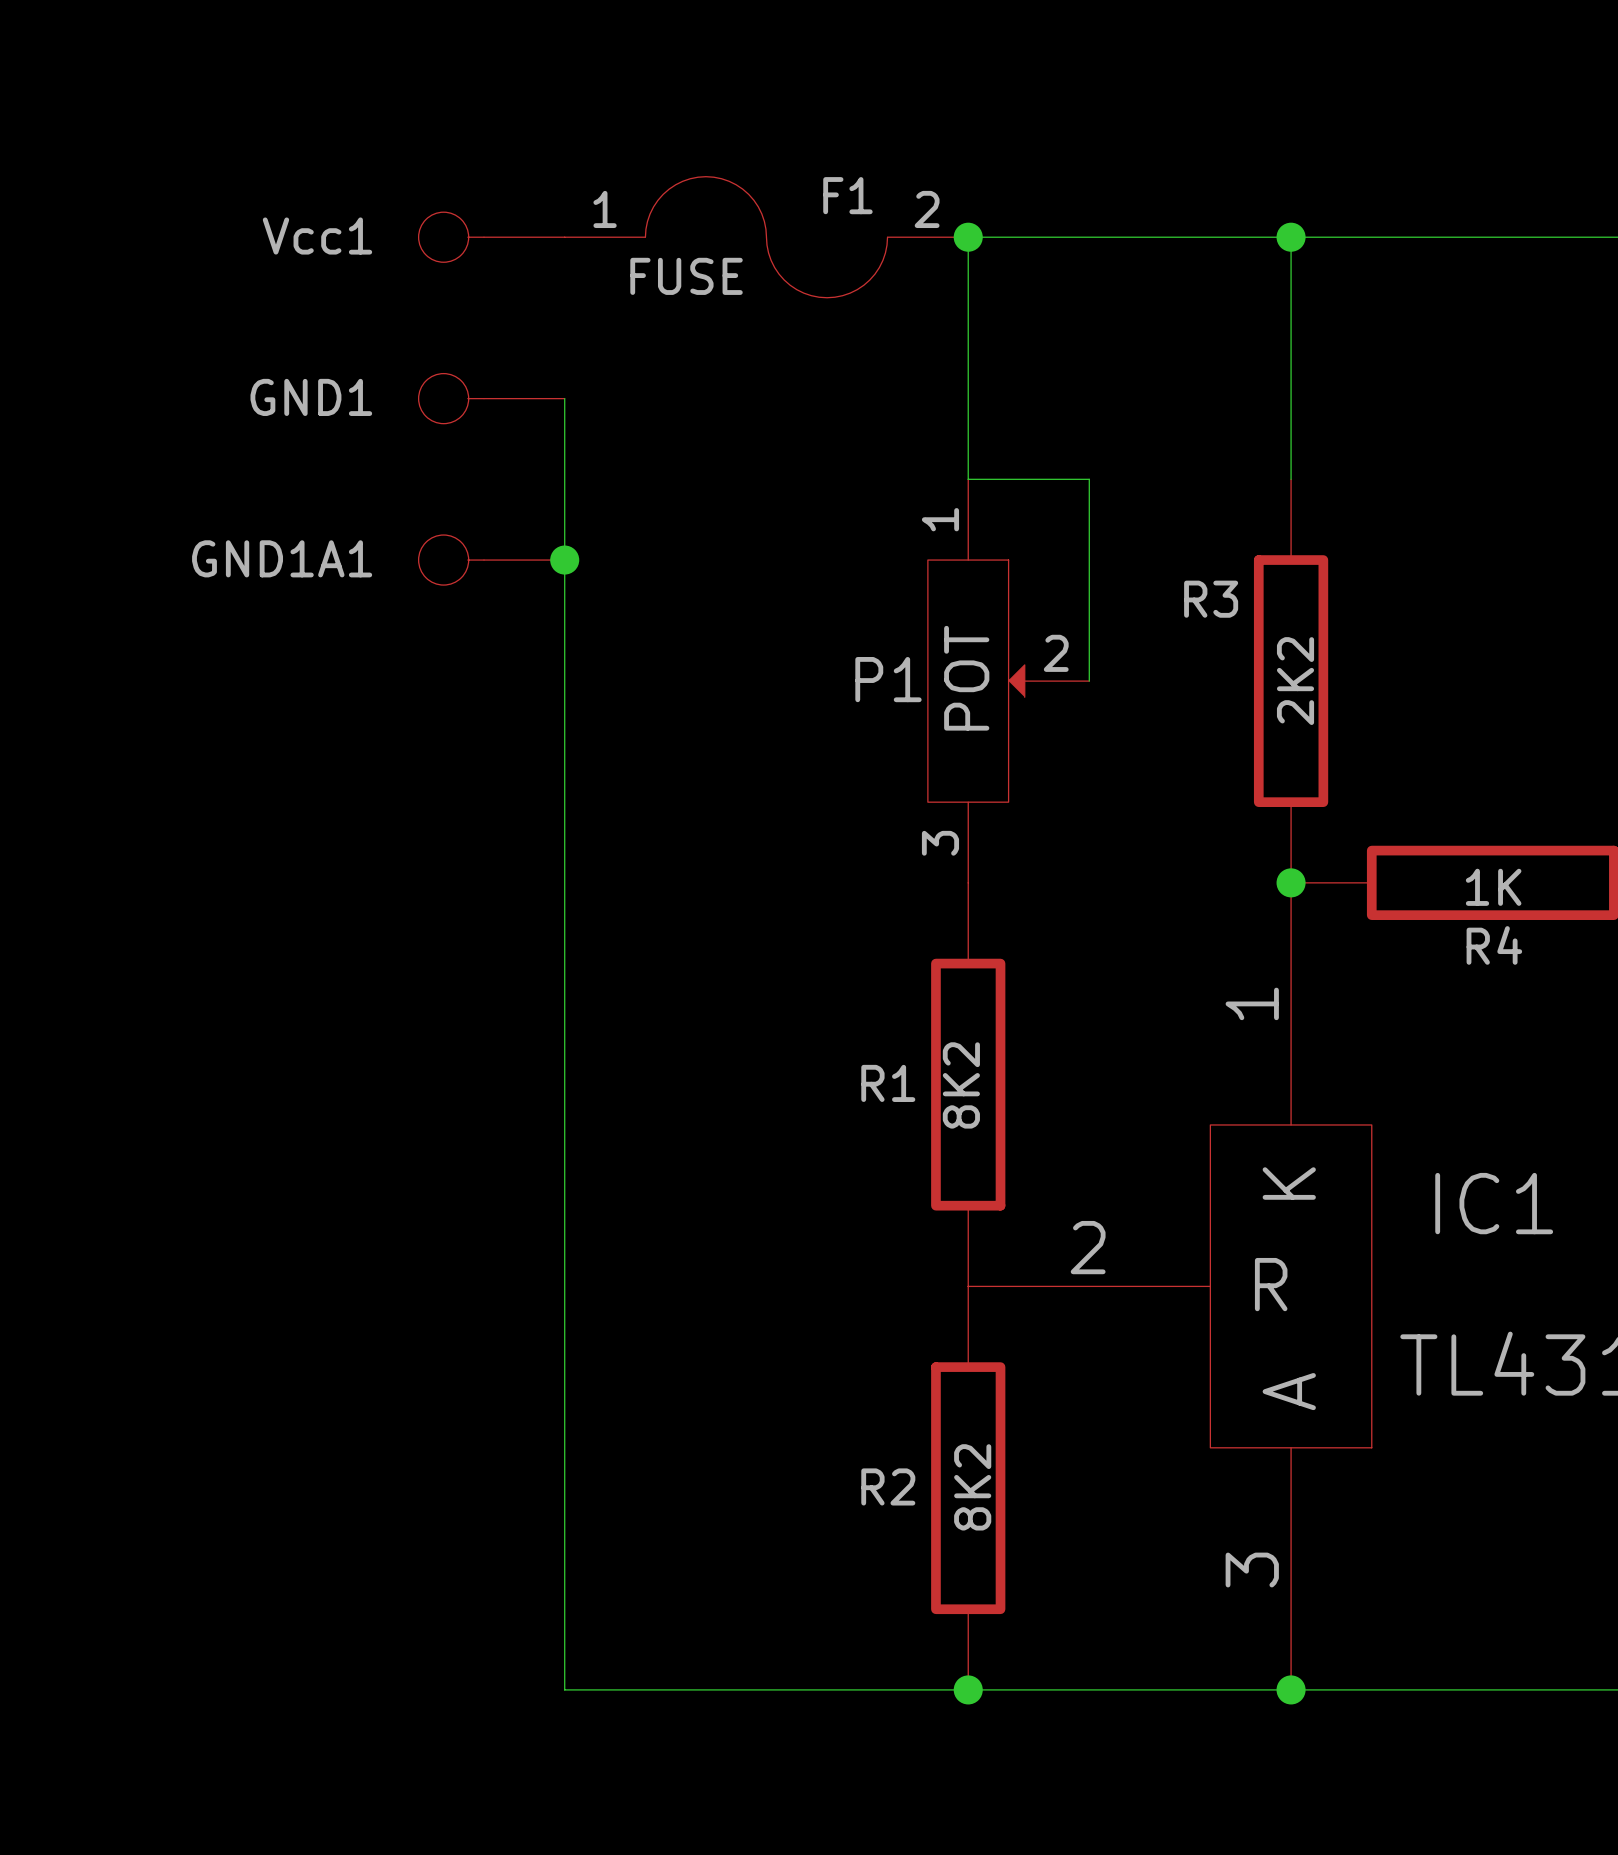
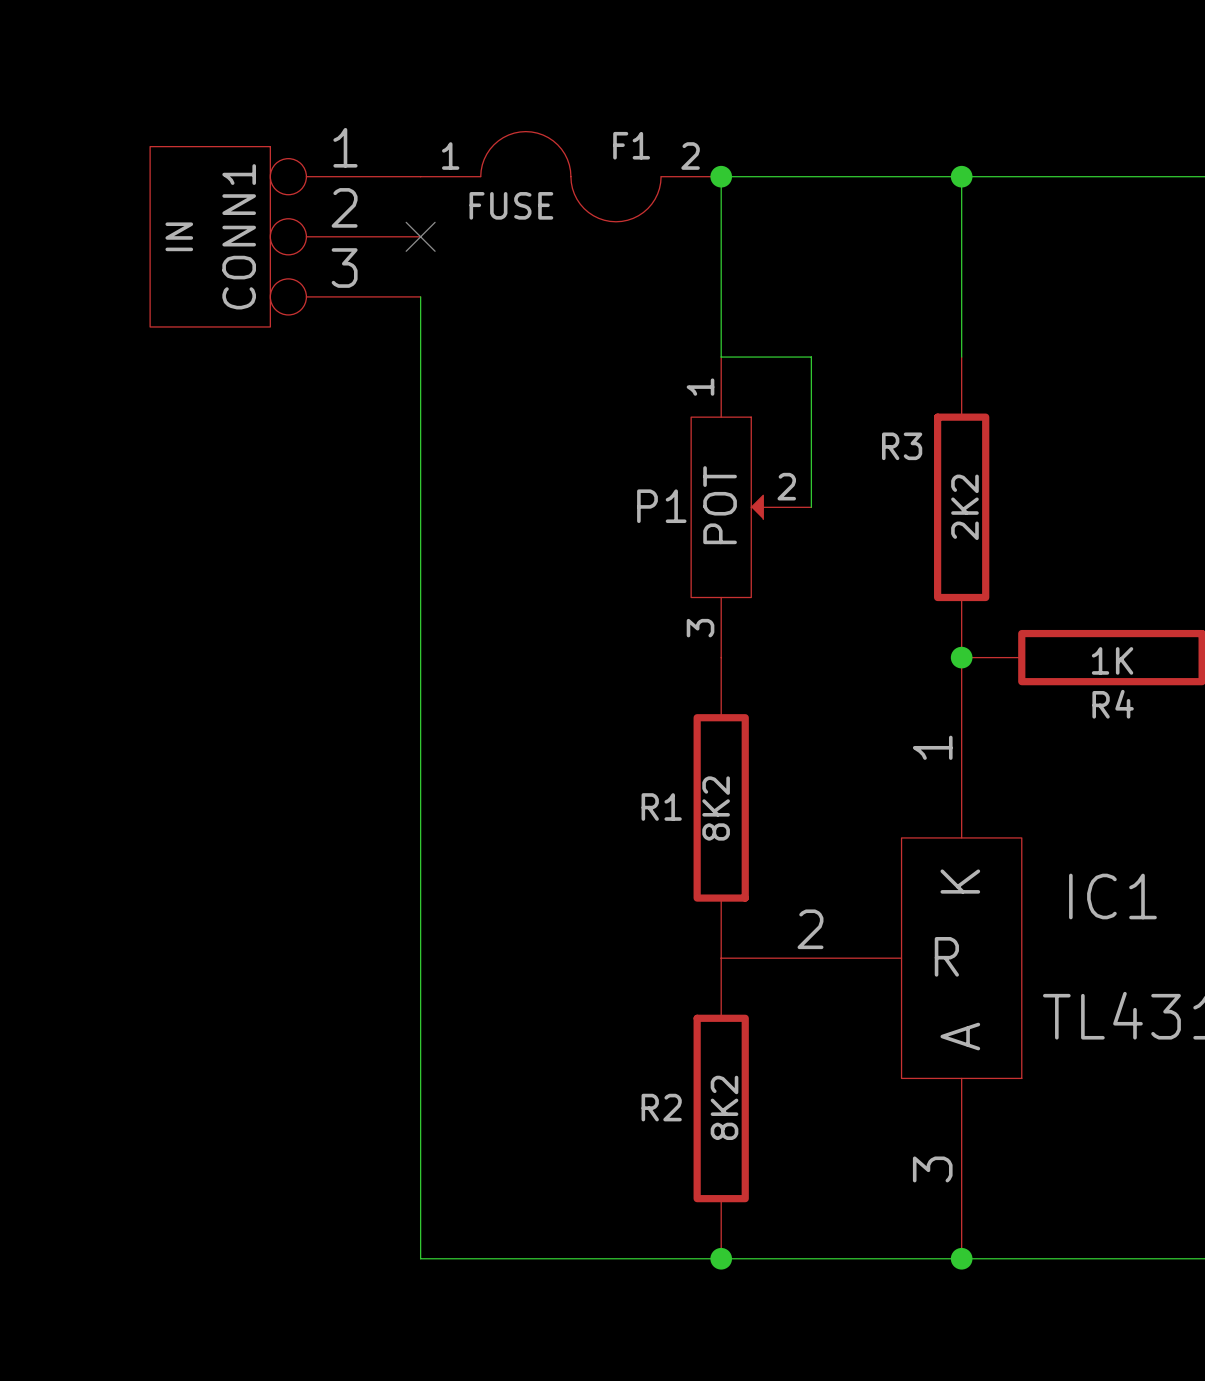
Vcc1: (491, 237) -> none
CONN1: none -> IN (285, 236)
no-connect mark: none -> (420, 236)
GND1: (491, 398) -> none
GND1A1: (491, 560) -> none
junction: (564, 560) -> none

